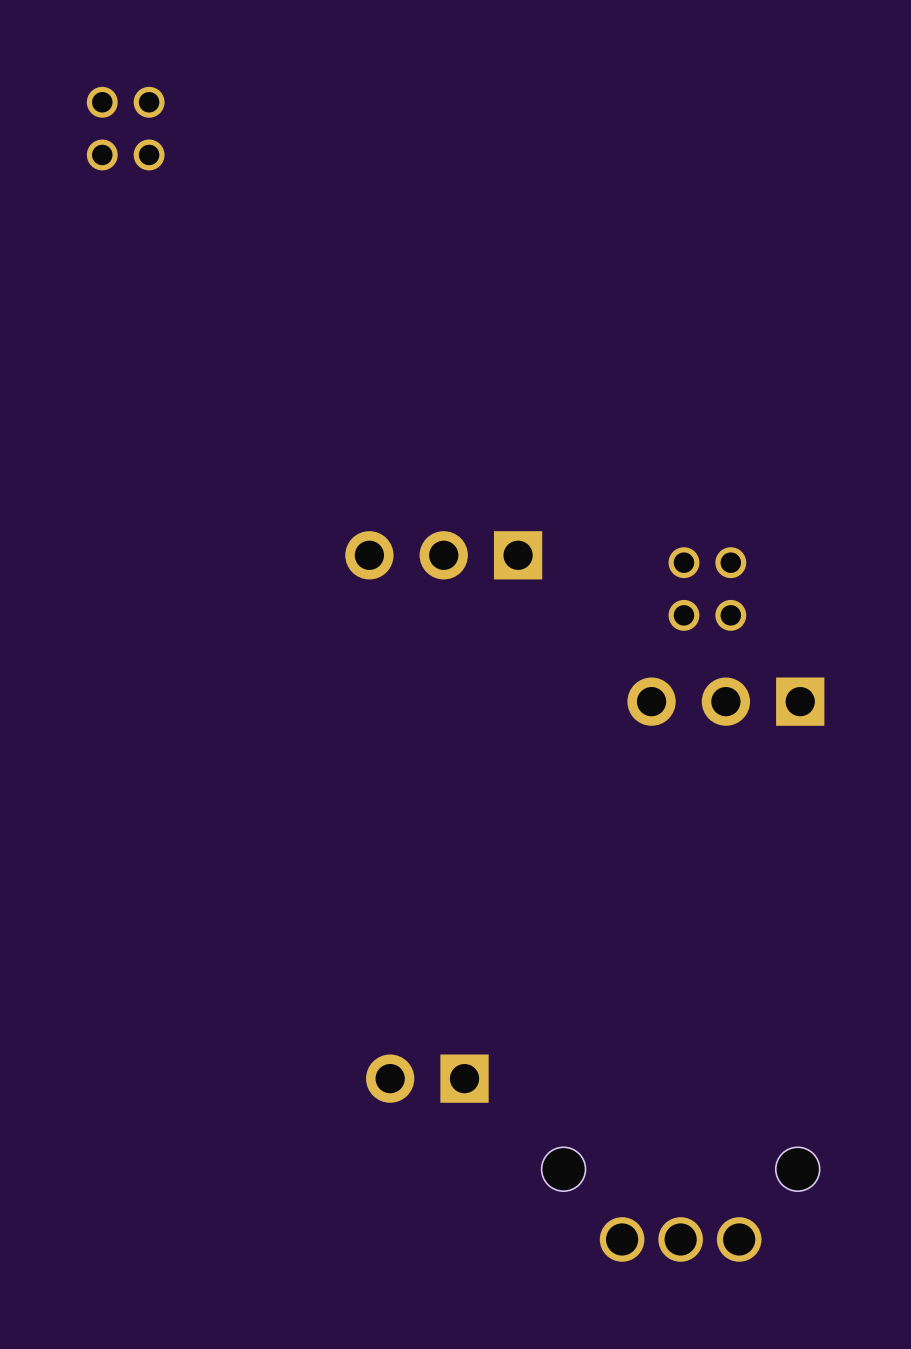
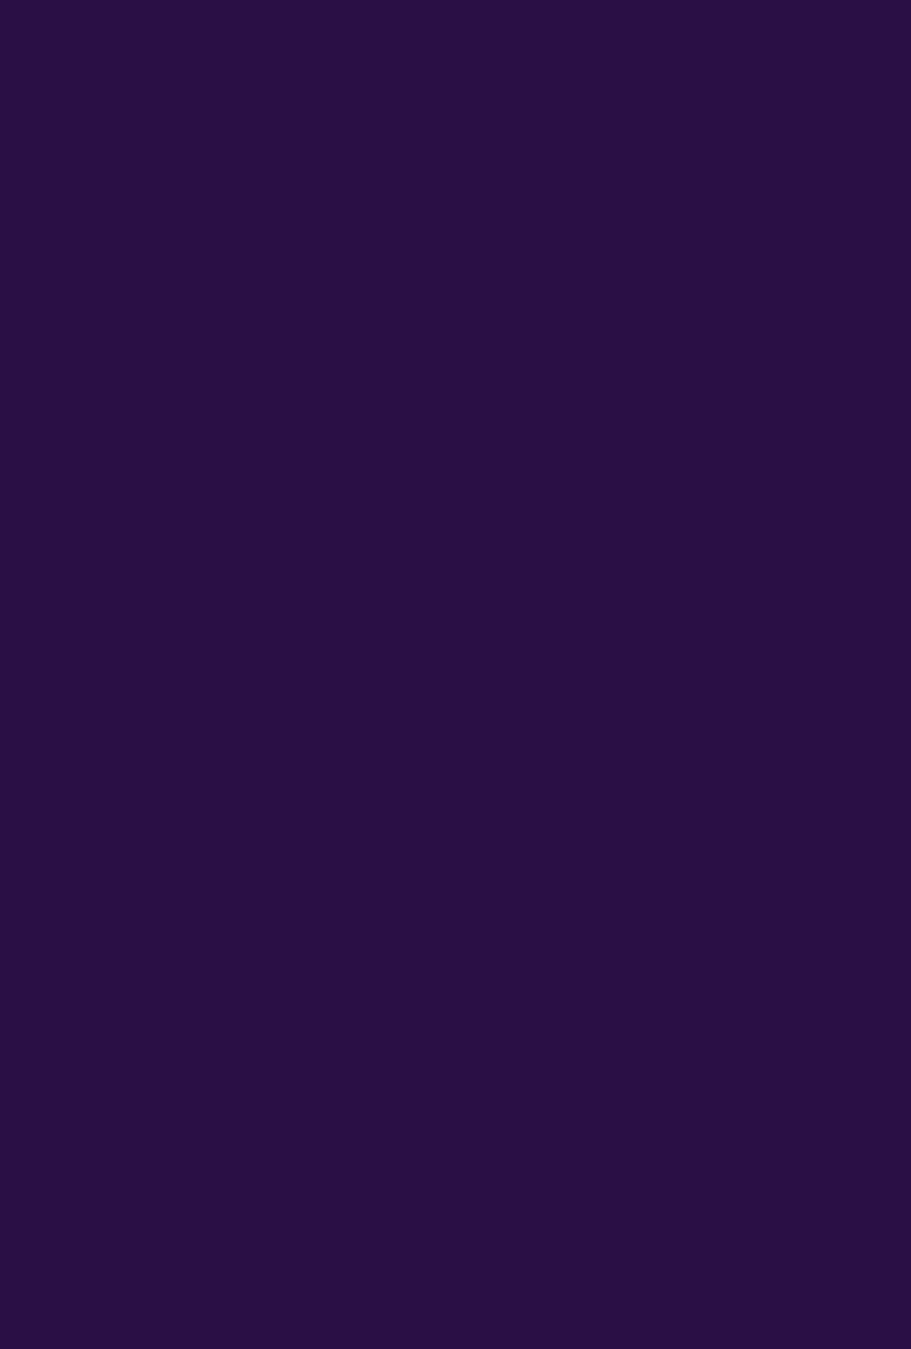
part: (125, 128) -> none
part: (443, 555) -> none
part: (707, 589) -> none
part: (725, 701) -> none
part: (427, 1078) -> none
part: (680, 1204) -> none

